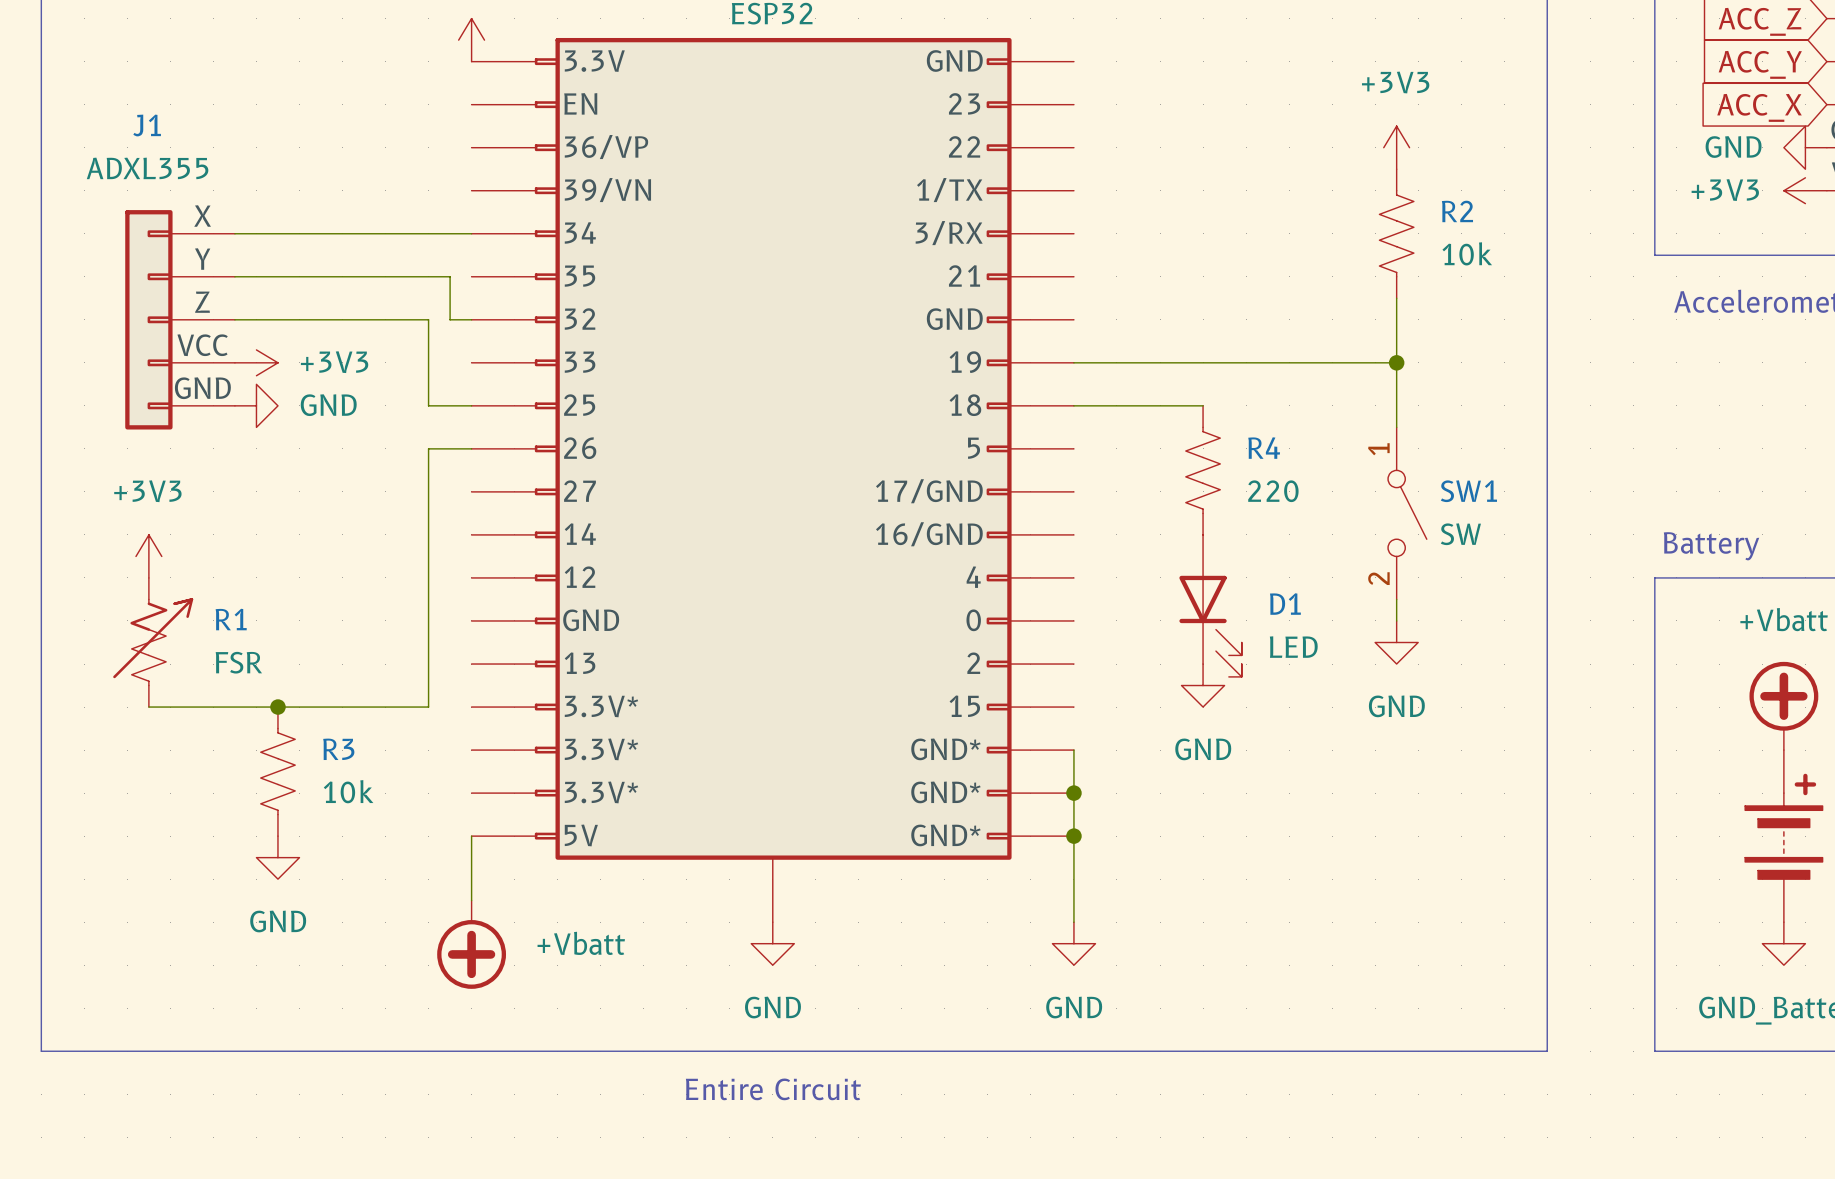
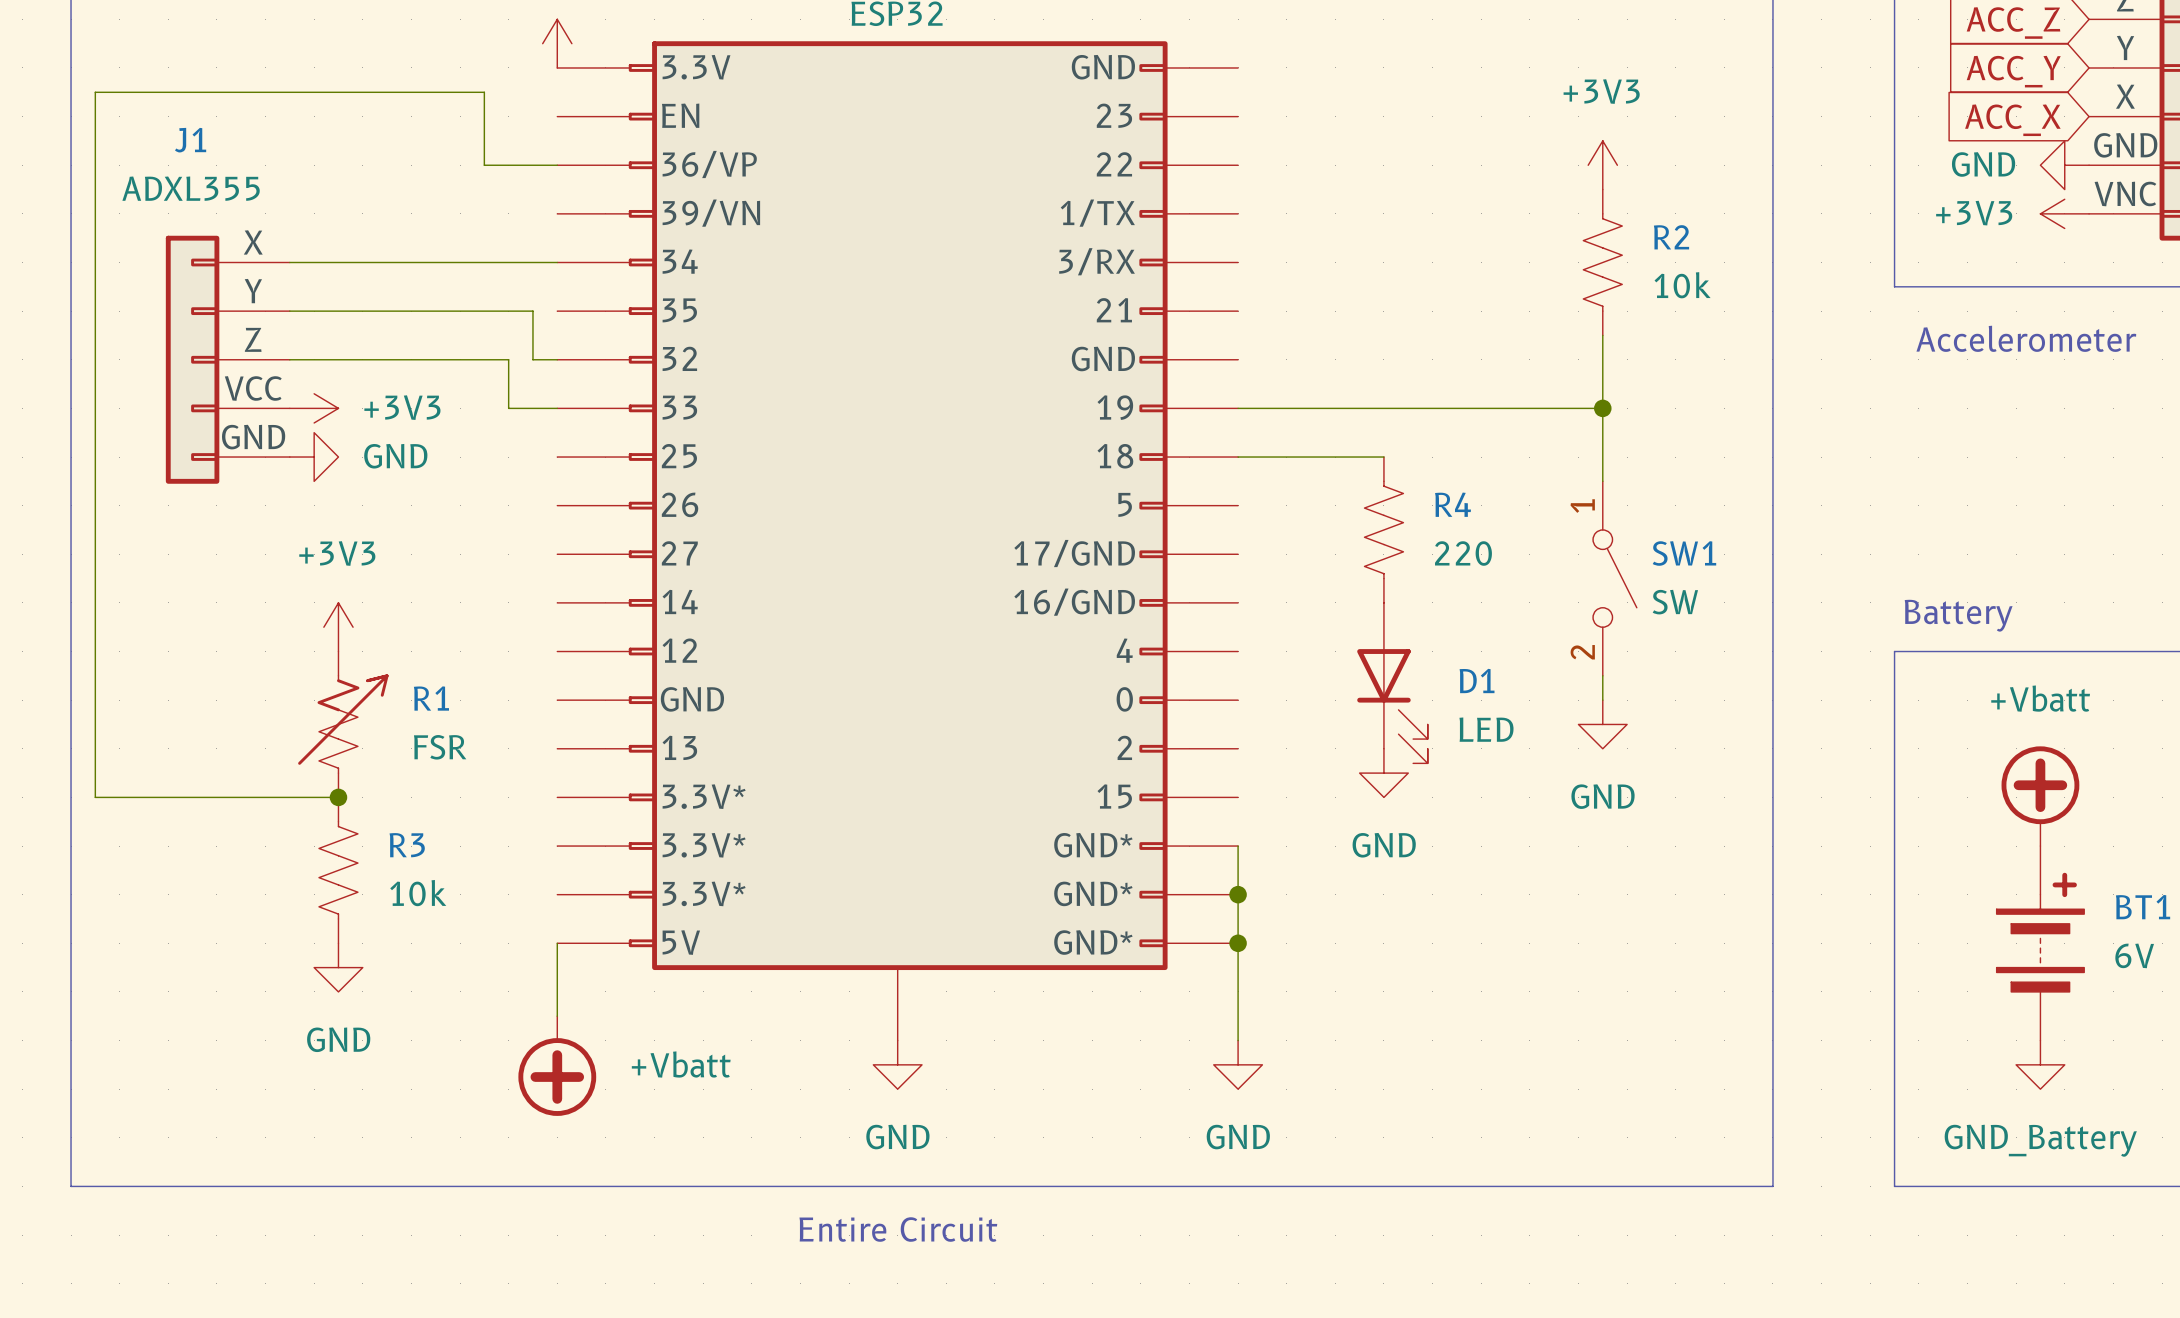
wire: none -> (557, 165) (484, 165) (484, 92) (95, 92) (95, 797) (192, 797)
wire: (428, 362) (428, 405) (471, 405) -> (508, 408) (557, 408)
wire: (471, 448) (428, 448) (428, 707) (277, 707) -> none
power symbol position: +3V3 (148, 556) -> +3V3 (338, 627)
R1 position: (153, 642) -> (343, 724)

